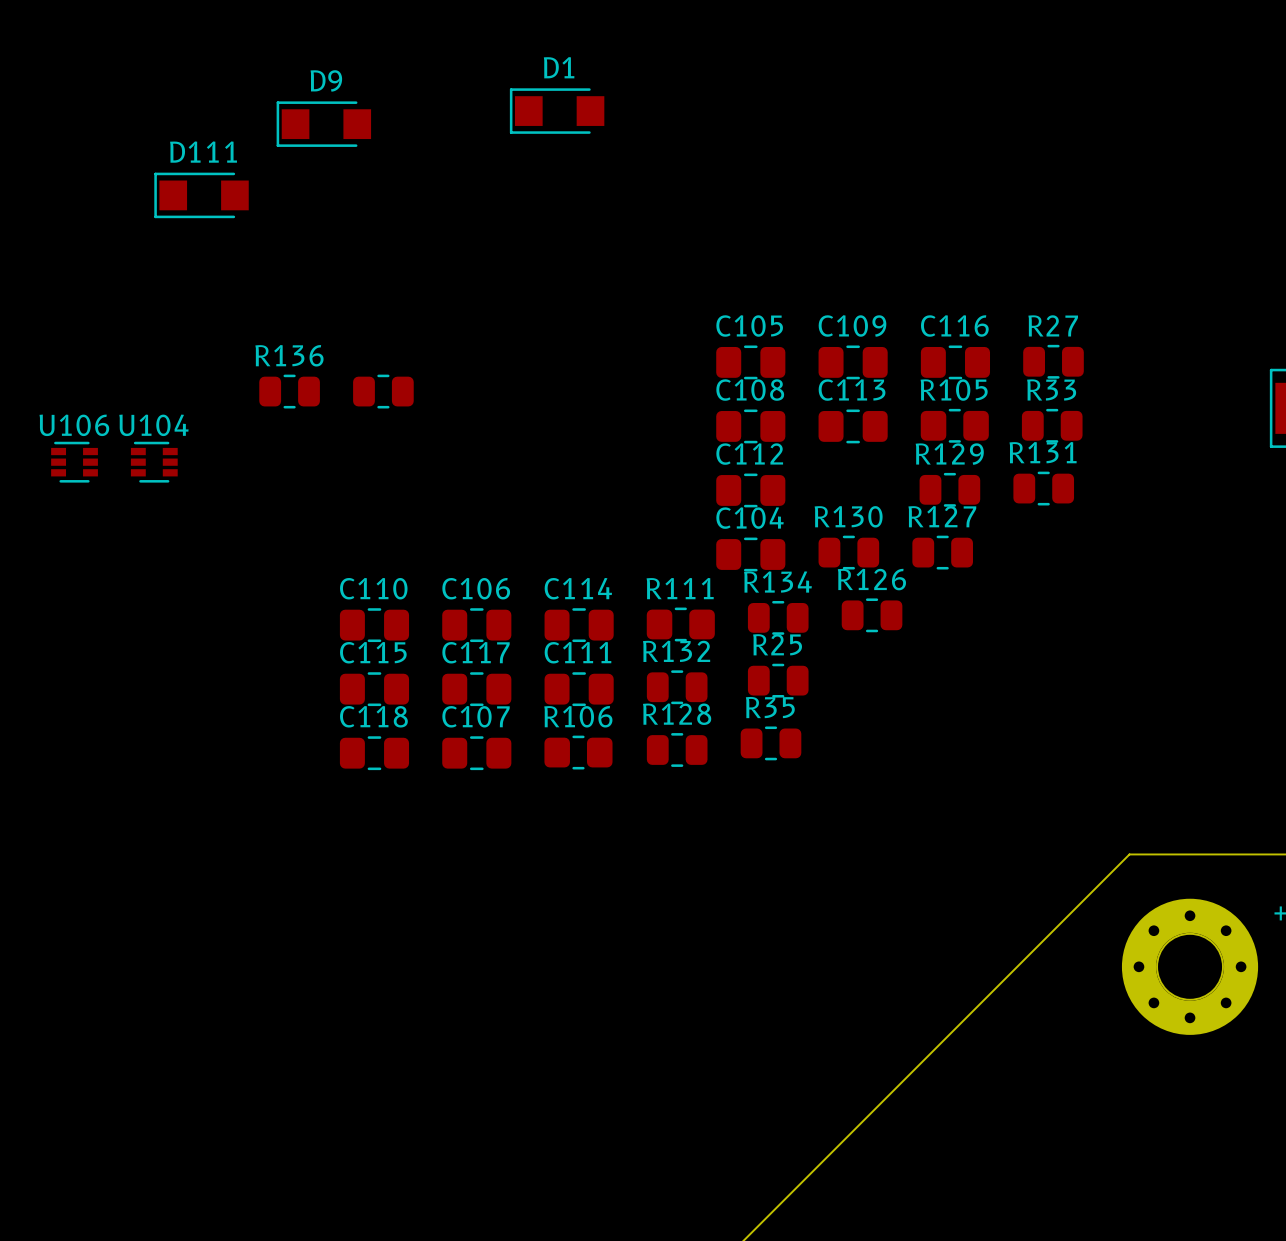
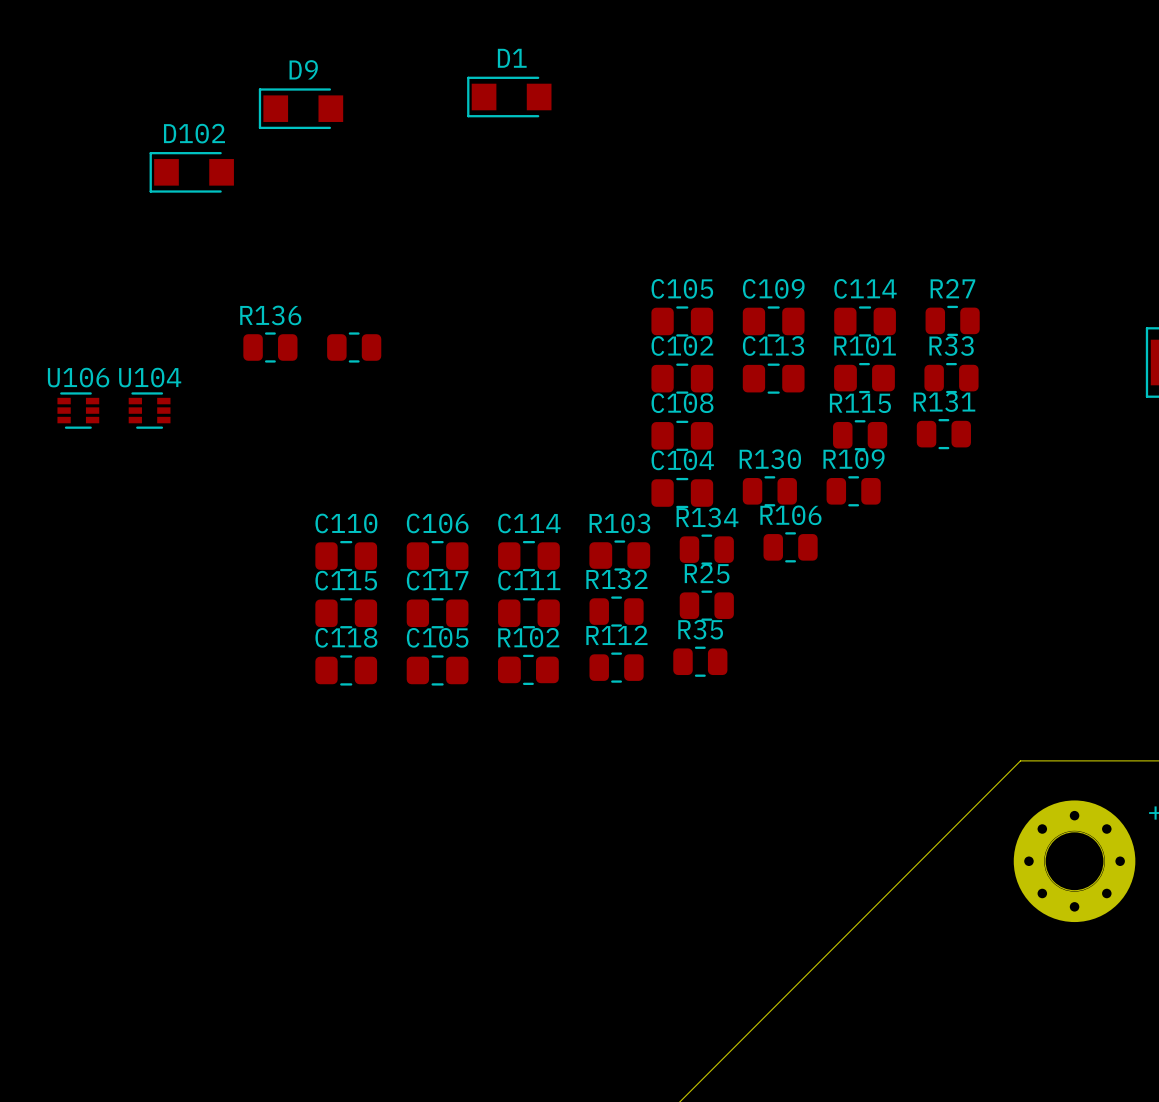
D111 name: D111 (203, 152) -> D102 (194, 133)
C116 name: C116 (954, 325) -> C114 (865, 288)
C108 name: C108 (750, 390) -> C102 (682, 346)
R105 name: R105 (954, 390) -> R101 (865, 346)
C112 name: C112 (749, 454) -> C108 (682, 403)
R129 name: R129 (949, 454) -> R115 (860, 403)
R127 name: R127 (942, 516) -> R109 (854, 459)
R126 name: R126 (871, 579) -> R106 (790, 515)
R111 name: R111 (680, 588) -> R103 (619, 523)
R128 name: R128 (677, 714) -> R112 (616, 635)
C107 name: C107 (476, 716) -> C105 (437, 637)
R106 name: R106 (578, 716) -> R102 (528, 637)

